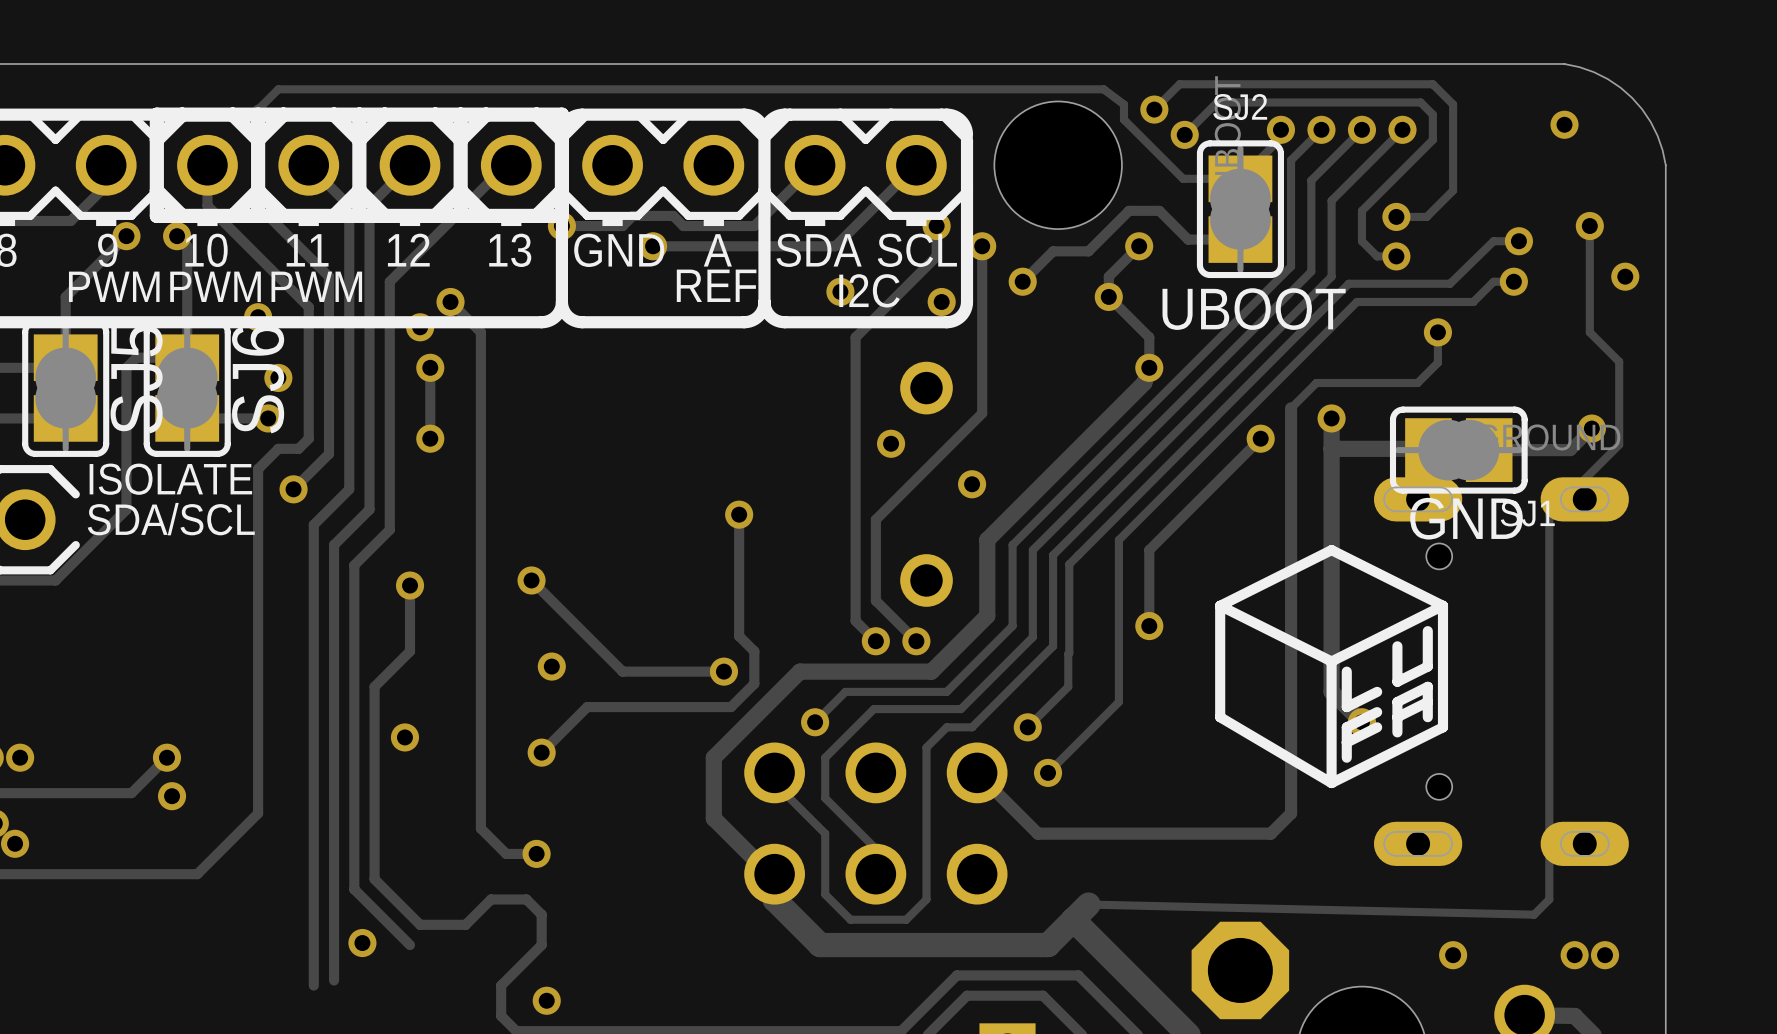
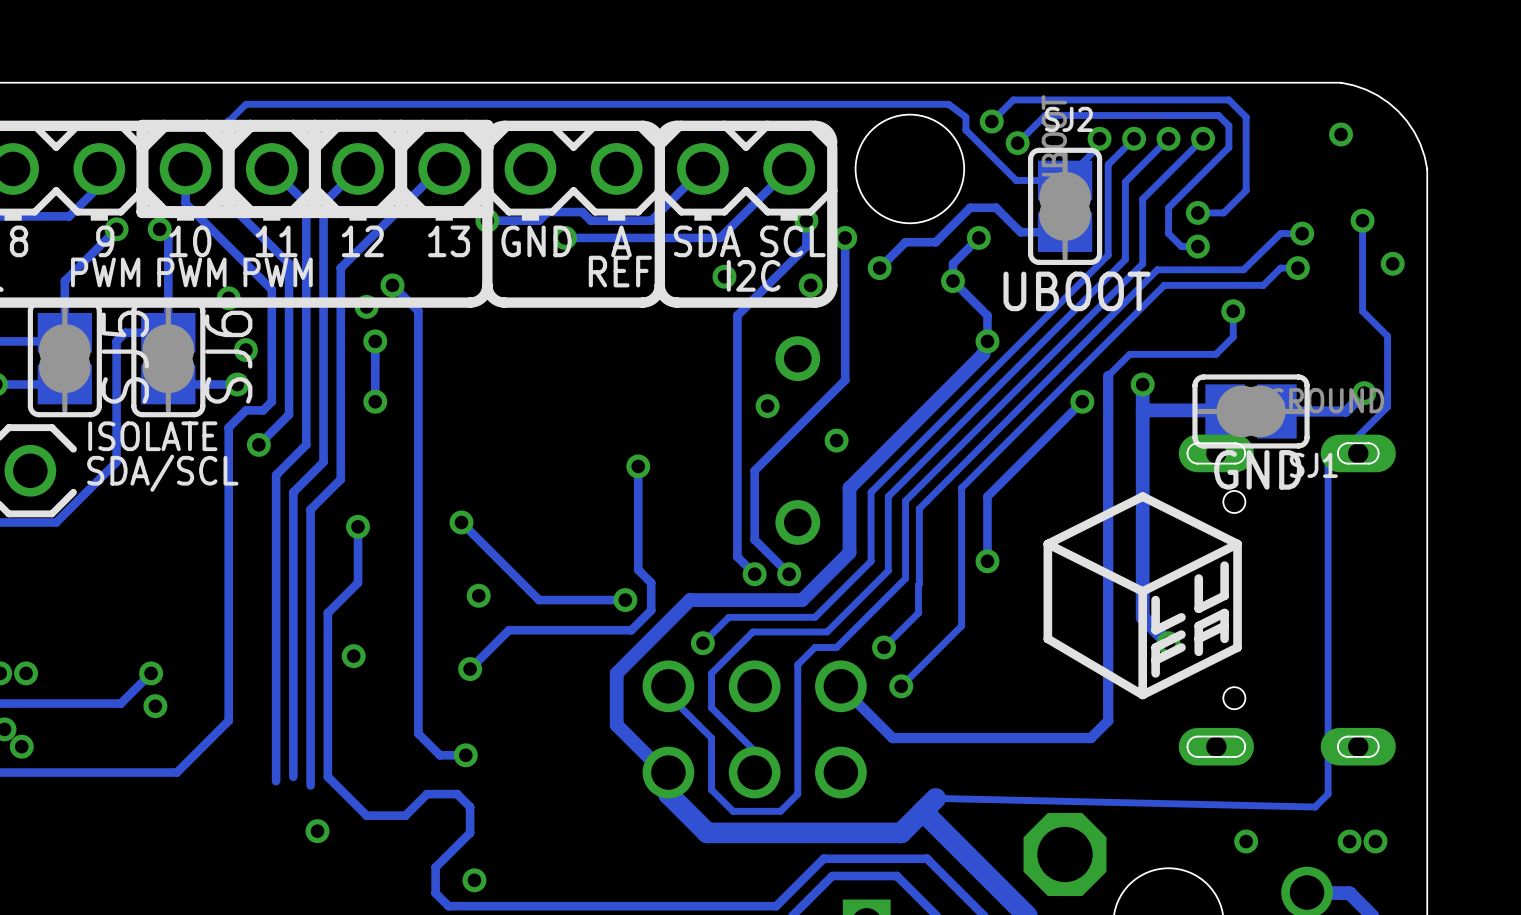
track: (334, 879) (334, 980) -> none
track: (313, 884) (313, 985) -> none
track: (354, 889) (410, 945) -> none

